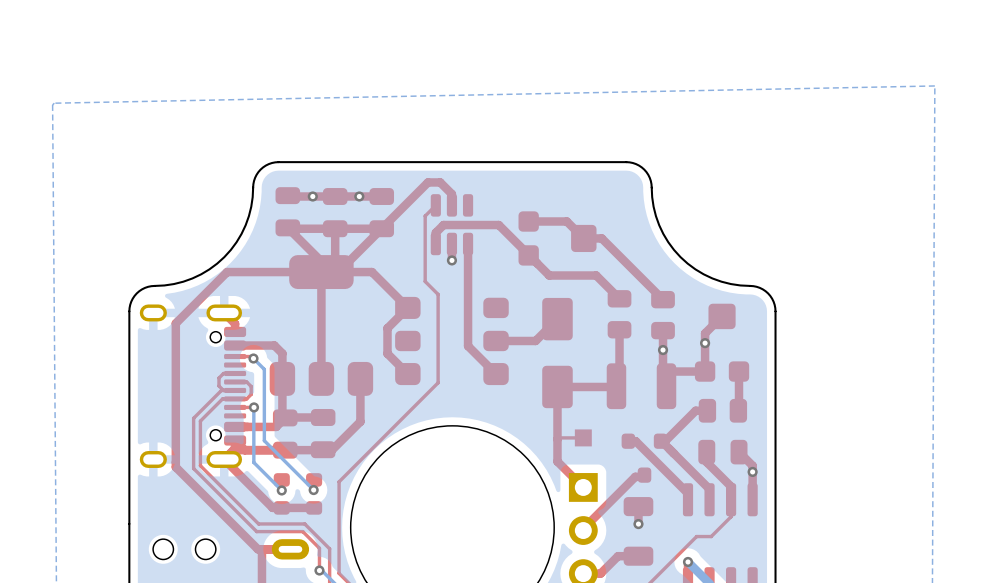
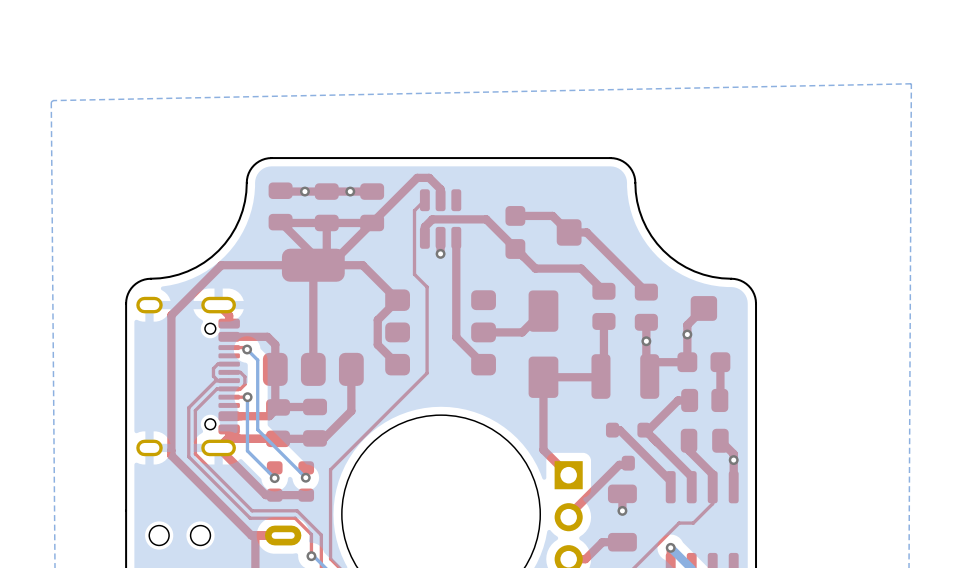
part: (583, 437) -> none
top track: (584, 437) (557, 439) -> none

